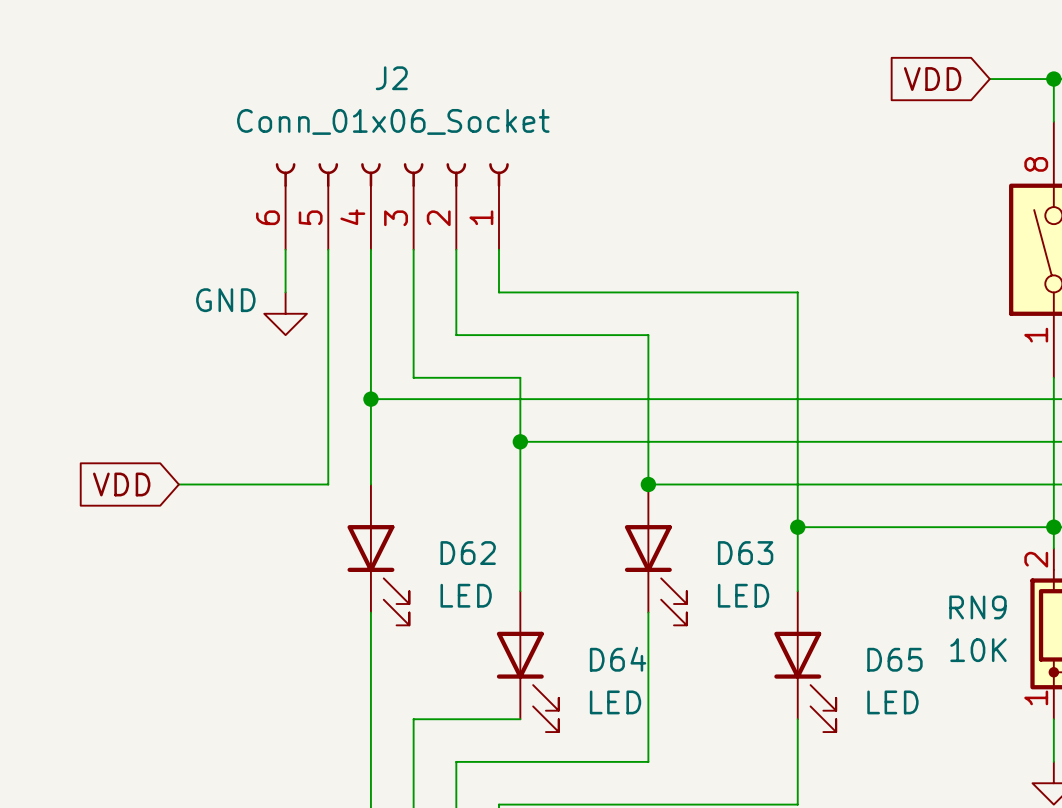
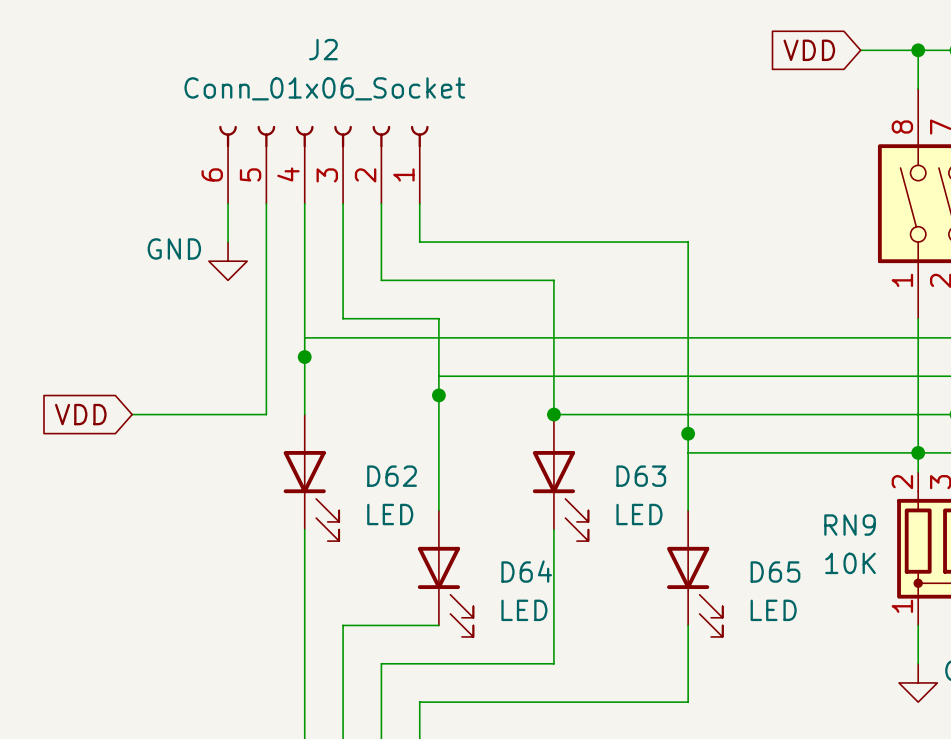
junction position: (370, 399) -> (304, 357)
junction position: (520, 441) -> (438, 395)
junction position: (797, 527) -> (688, 433)

